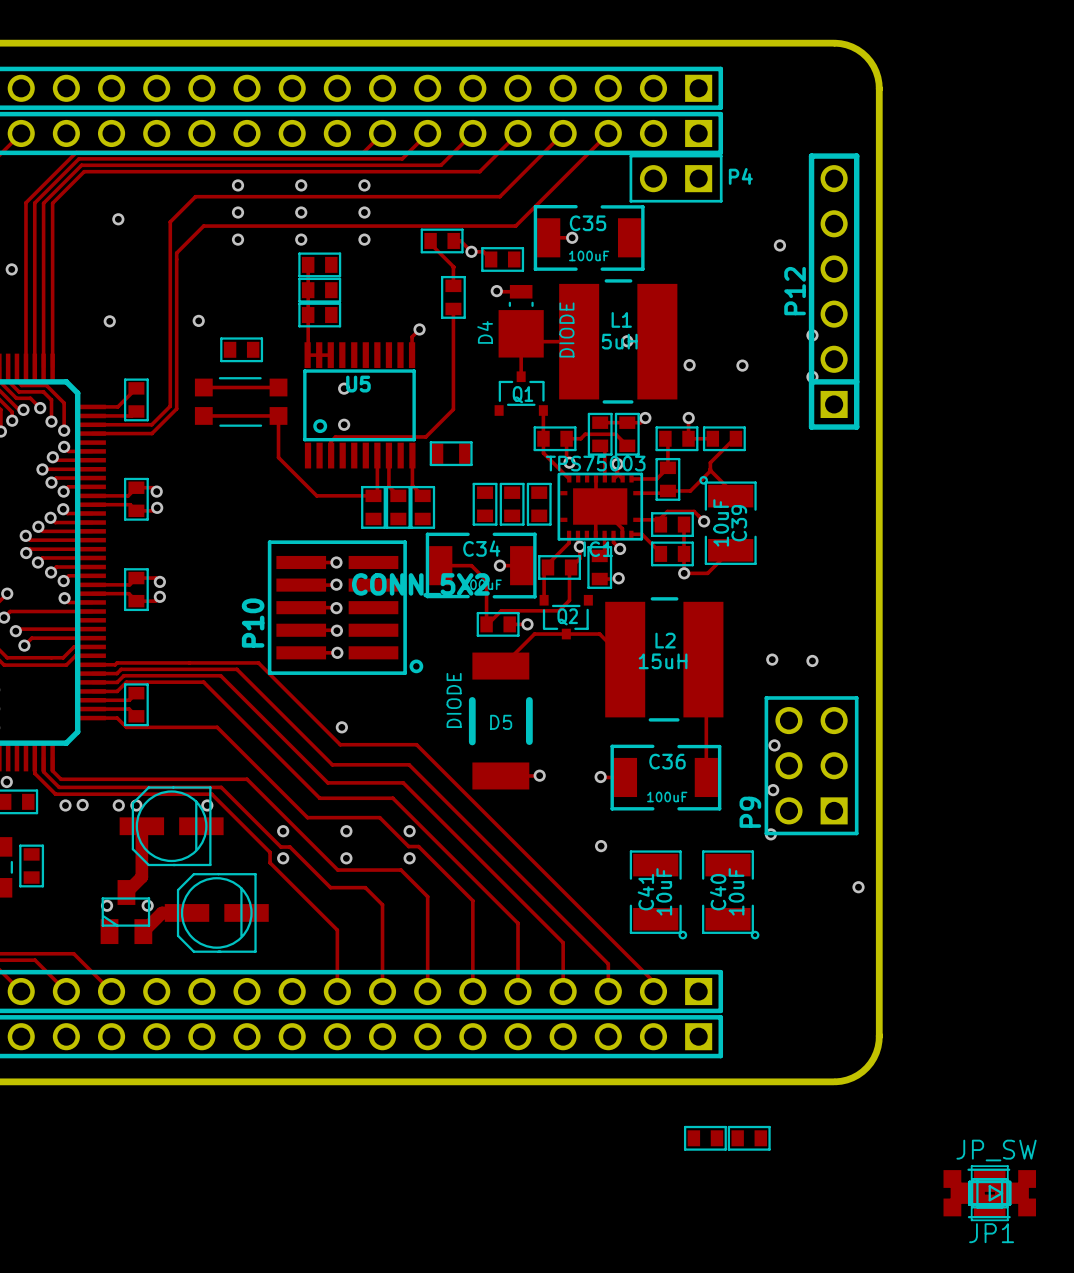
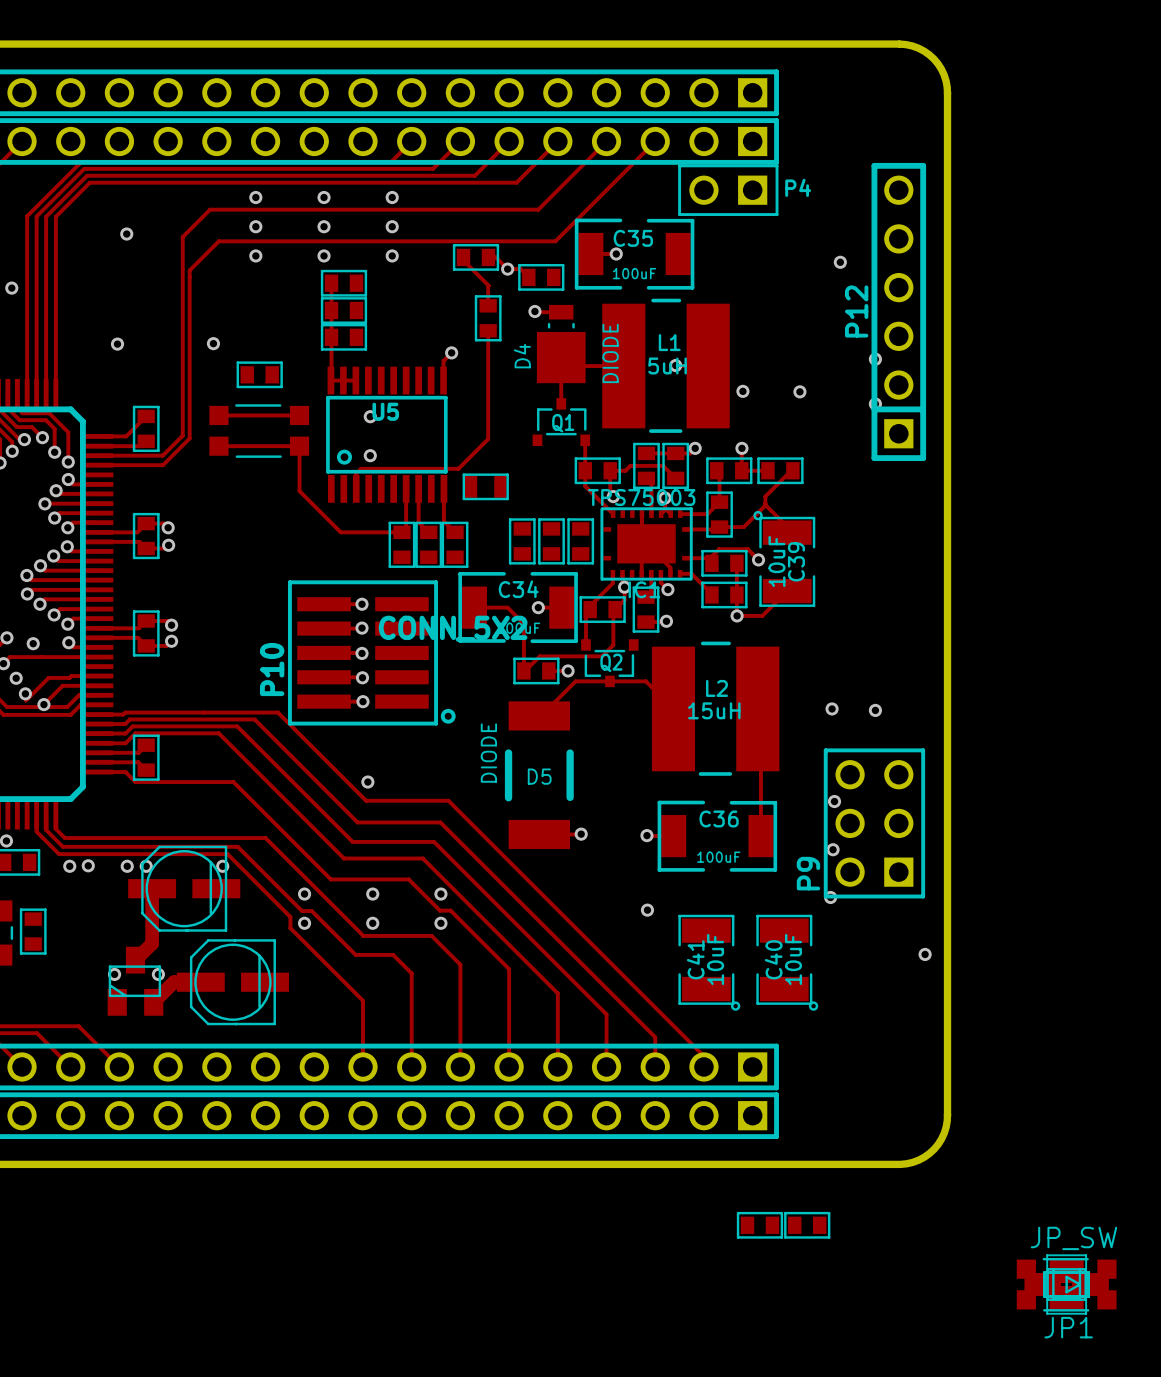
via: none -> (33, 643)
track: (67, 629) (17, 629) (15, 631) -> (71, 676) (69, 677) (48, 677) (25, 700)
track: (58, 638) (31, 638) (24, 645) -> (62, 685) (43, 704)
via: none -> (43, 704)

